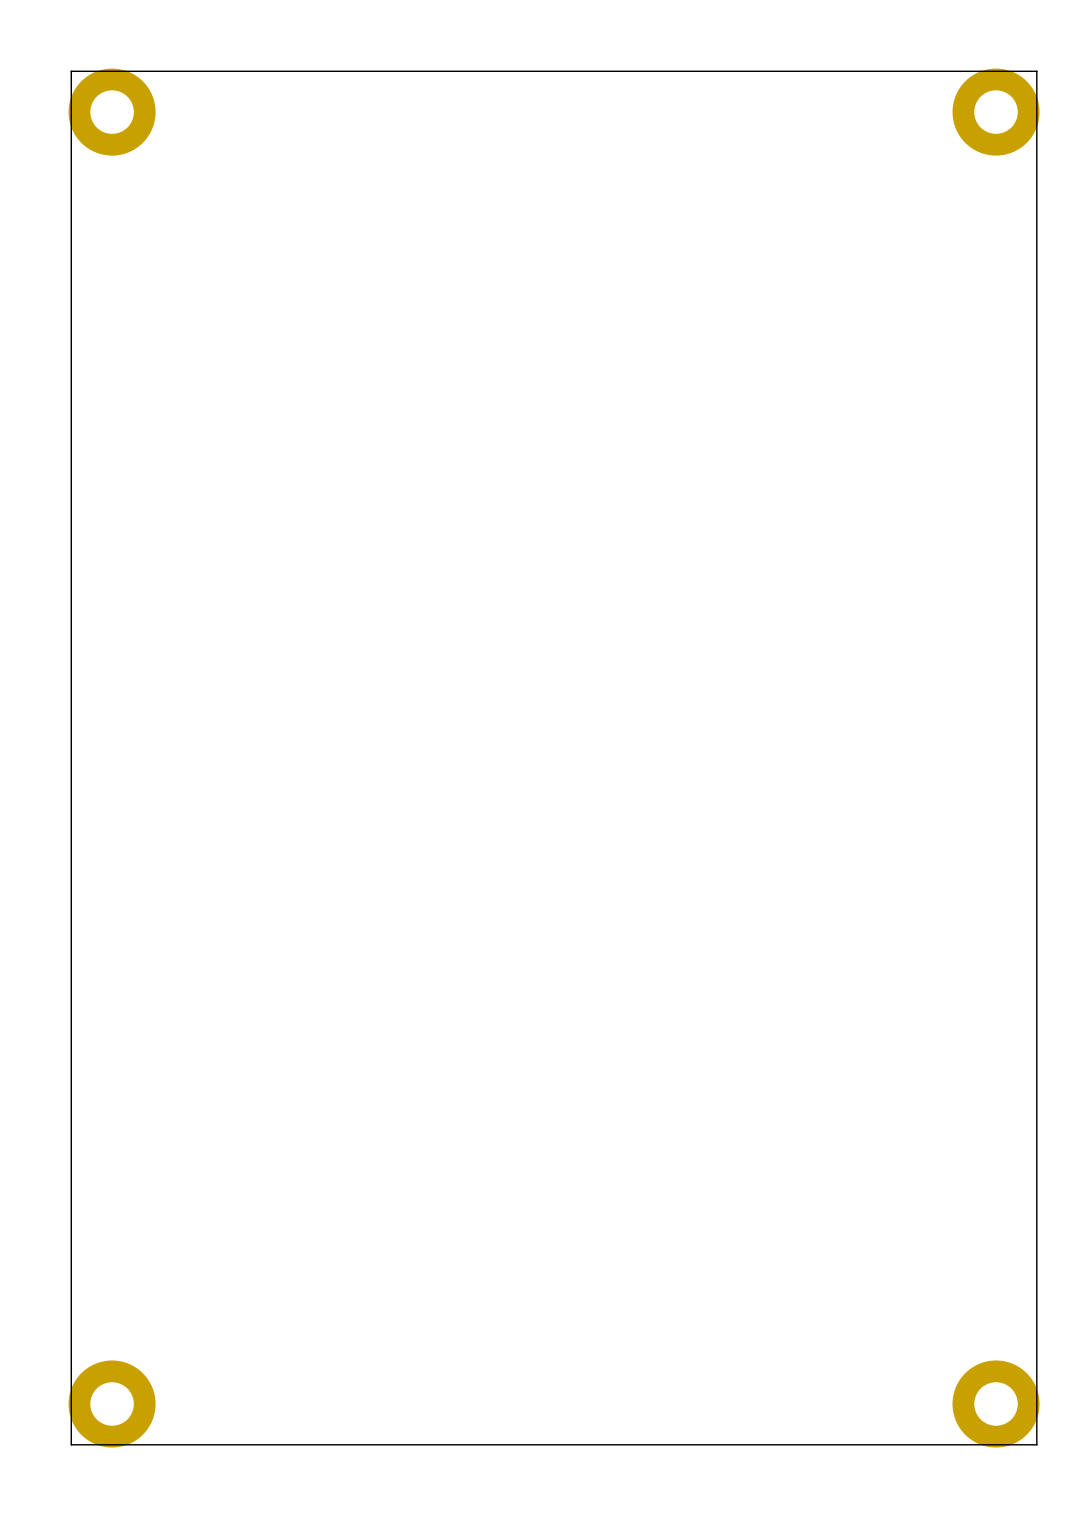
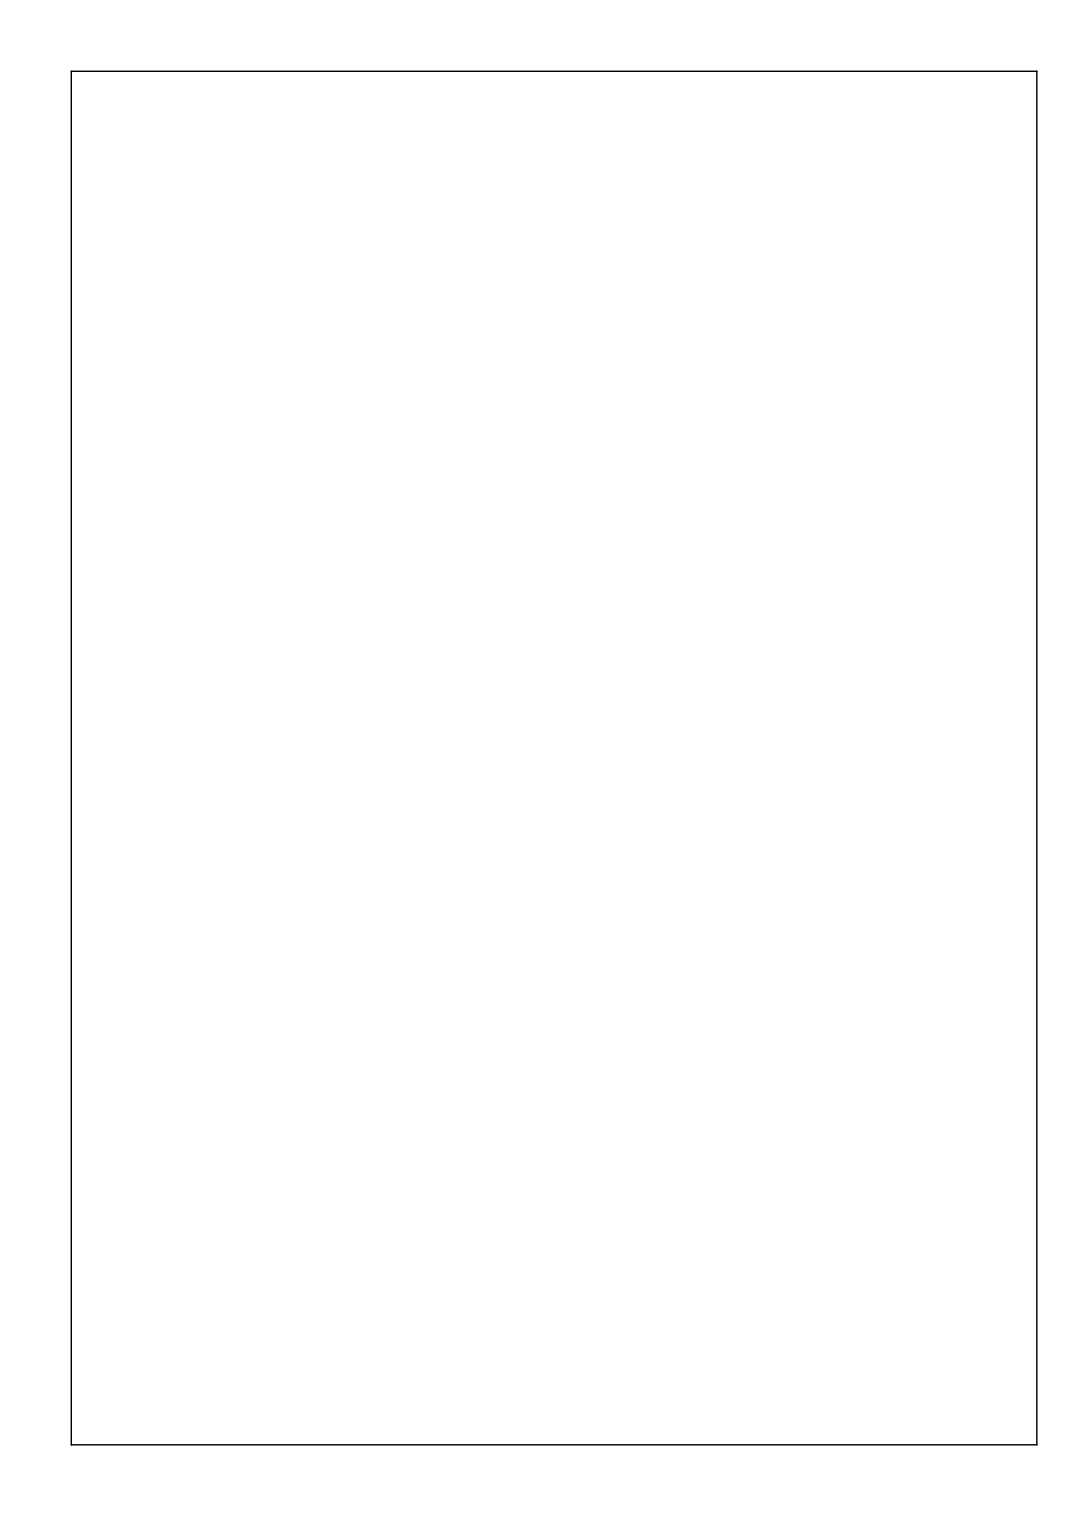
part: (112, 112) -> none
part: (996, 112) -> none
part: (112, 1403) -> none
part: (996, 1403) -> none

